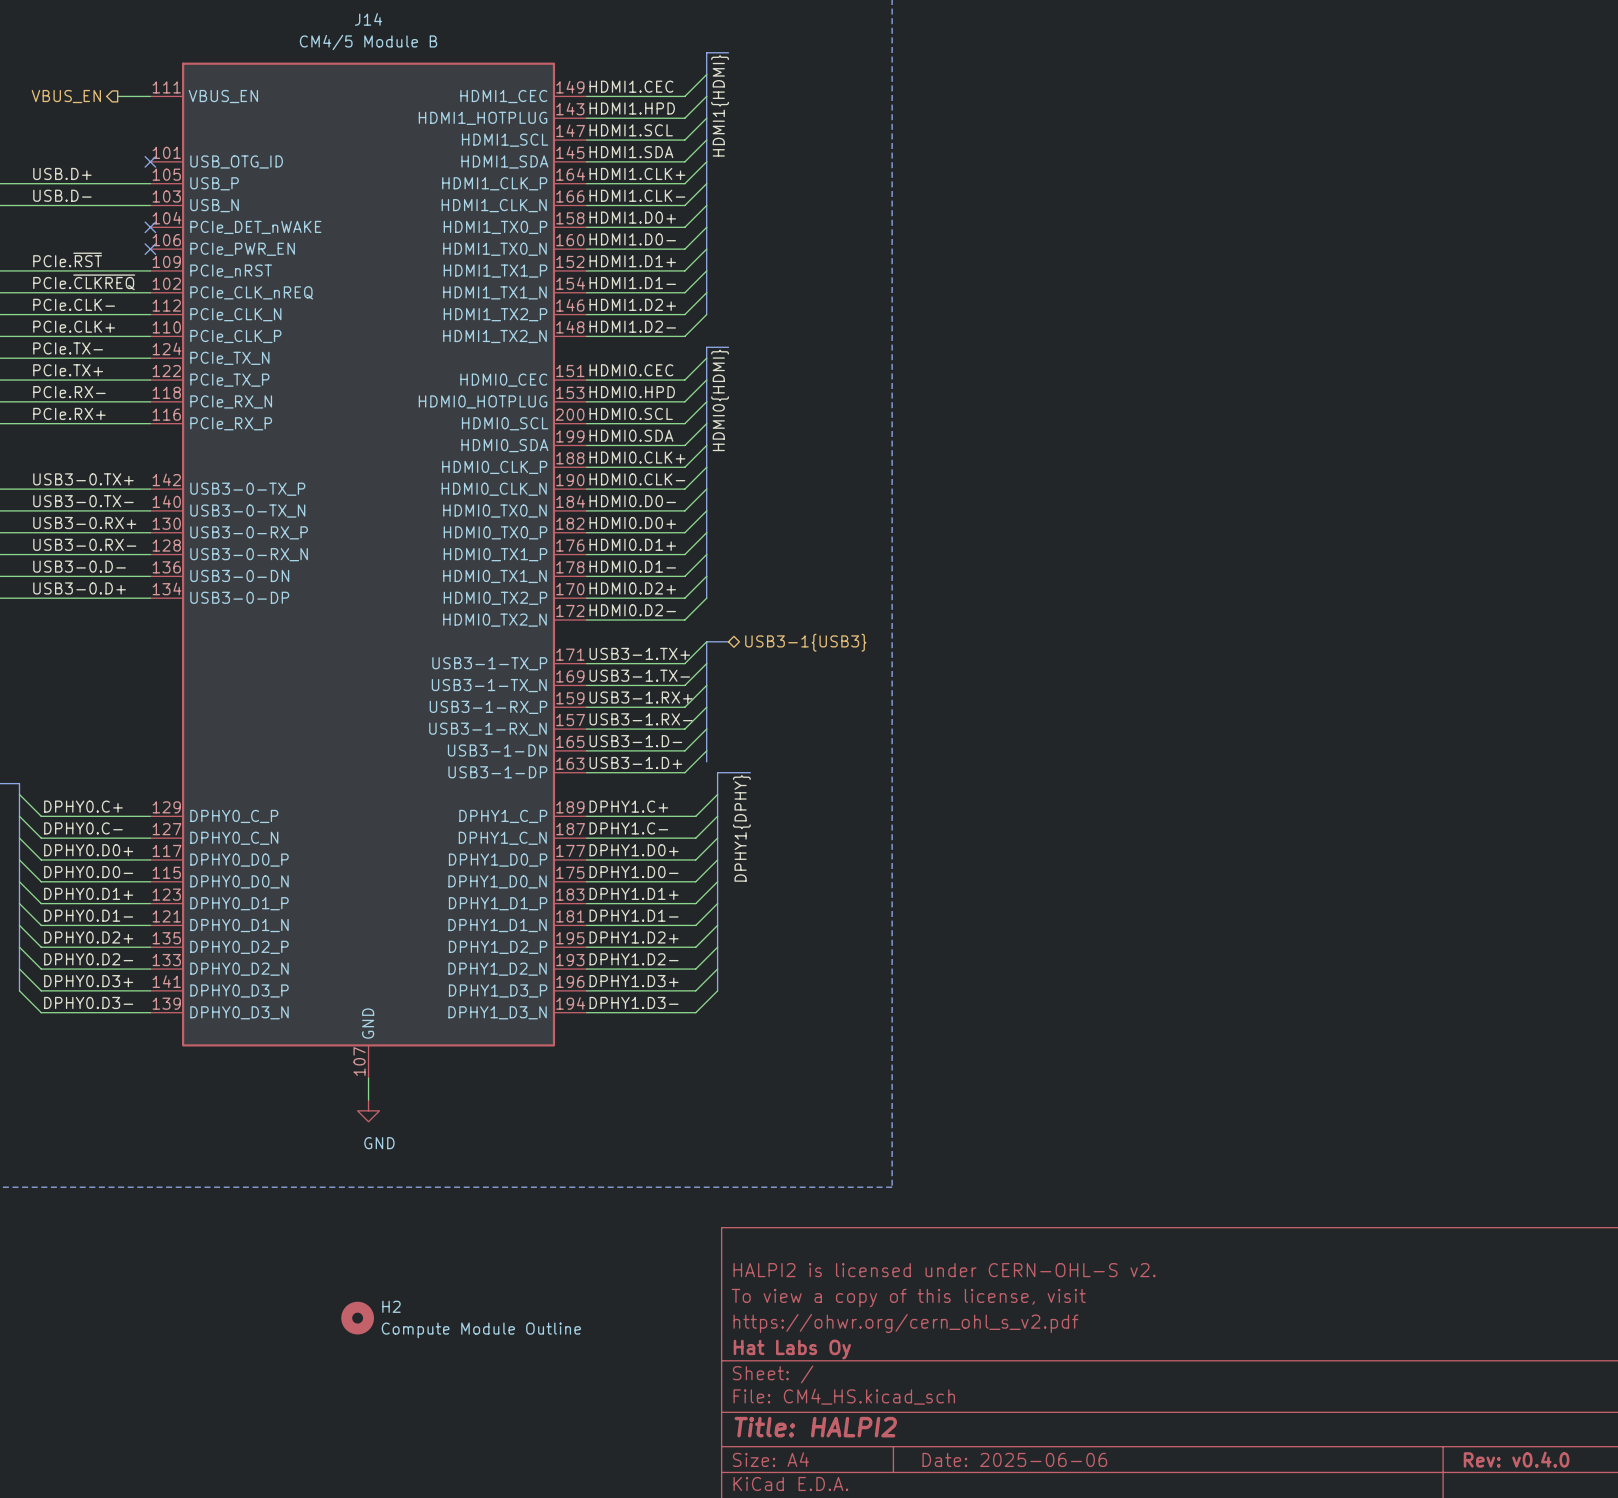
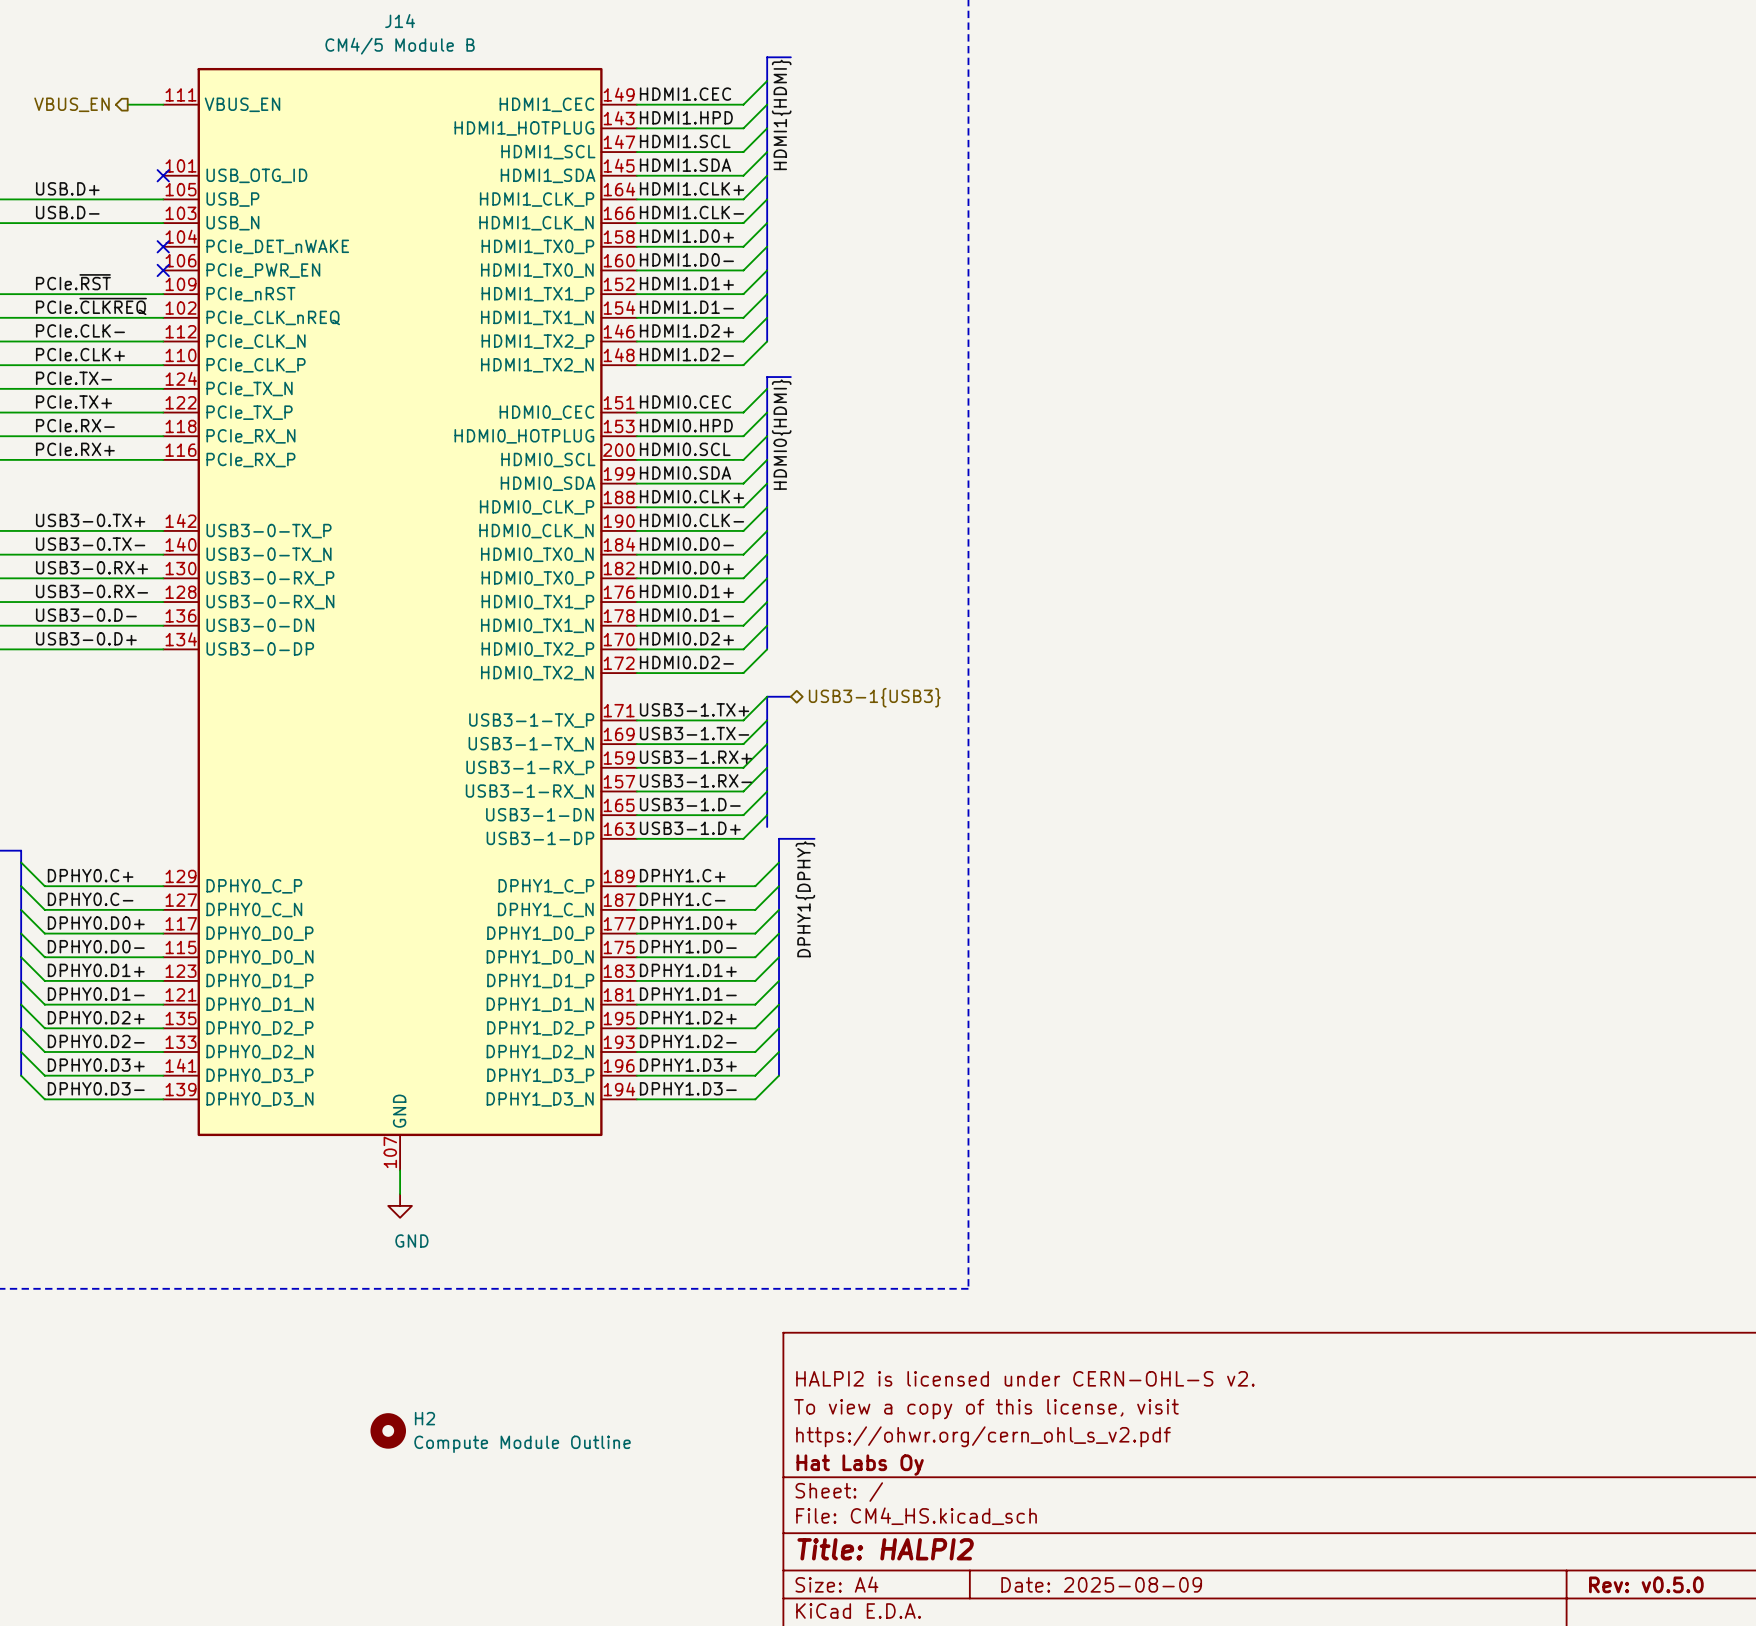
title block: Date: 2025-06-06 (1014, 1459) -> Date: 2025-08-09 (1101, 1584)
title block: Rev: v0.4.0 (1516, 1459) -> Rev: v0.5.0 (1646, 1584)

